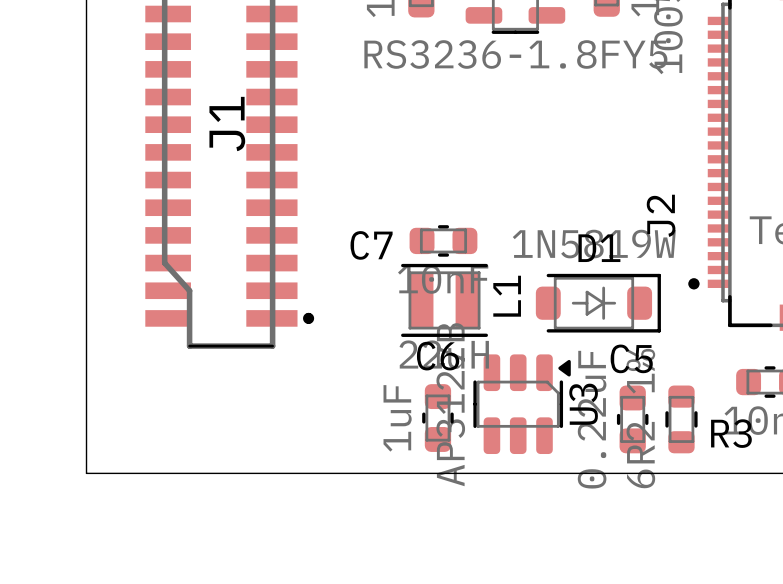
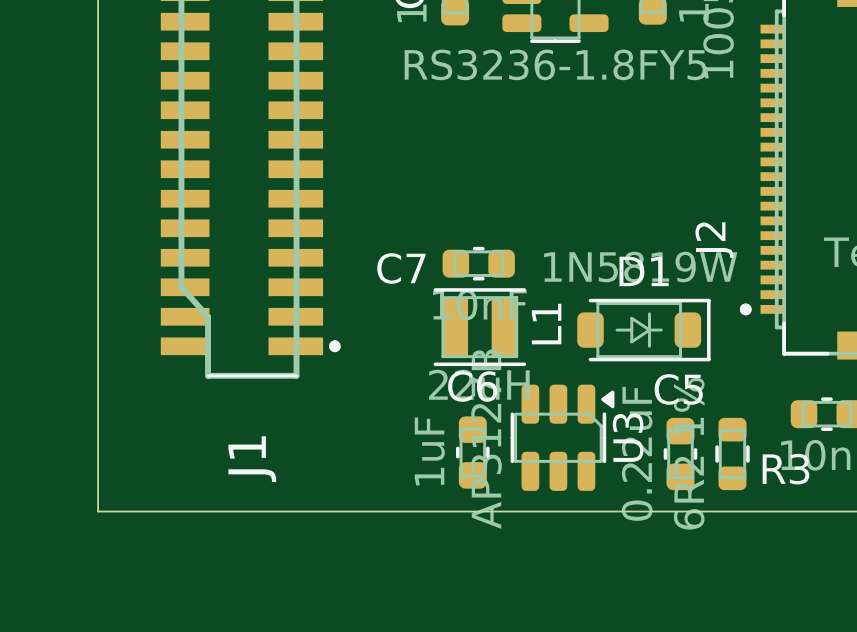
J1 name position: J1 (227, 124) -> J1 (252, 459)

